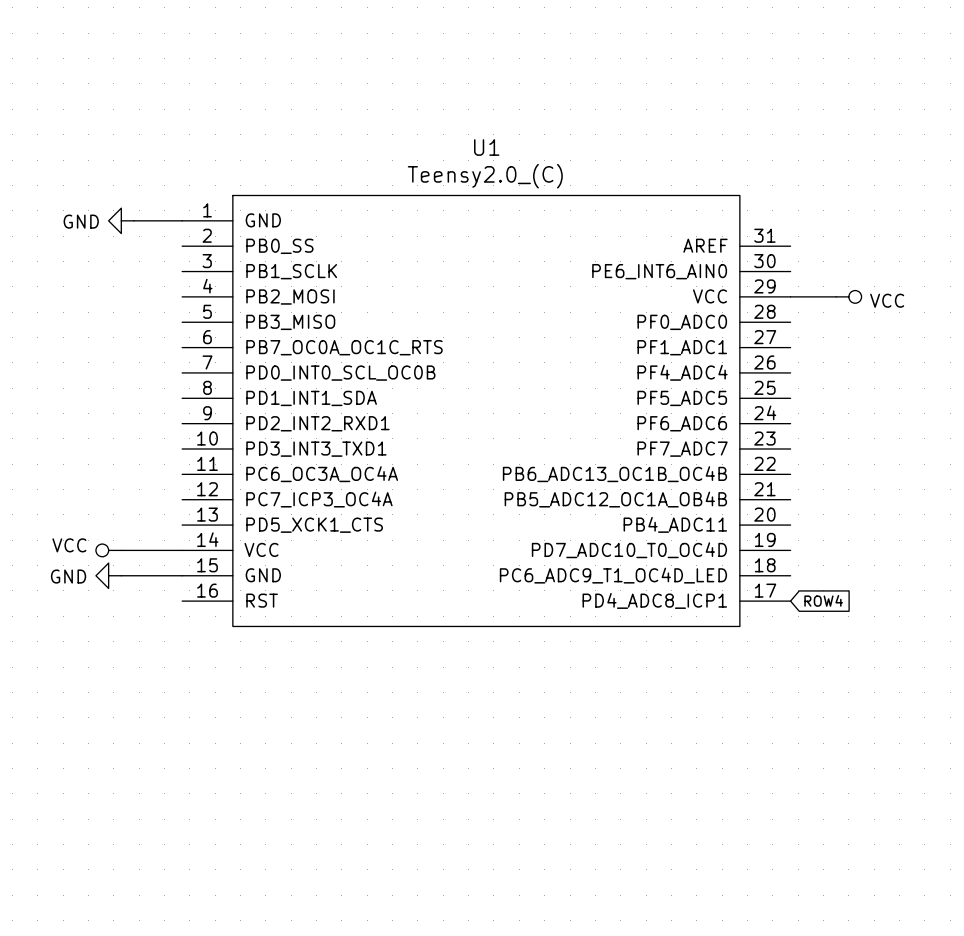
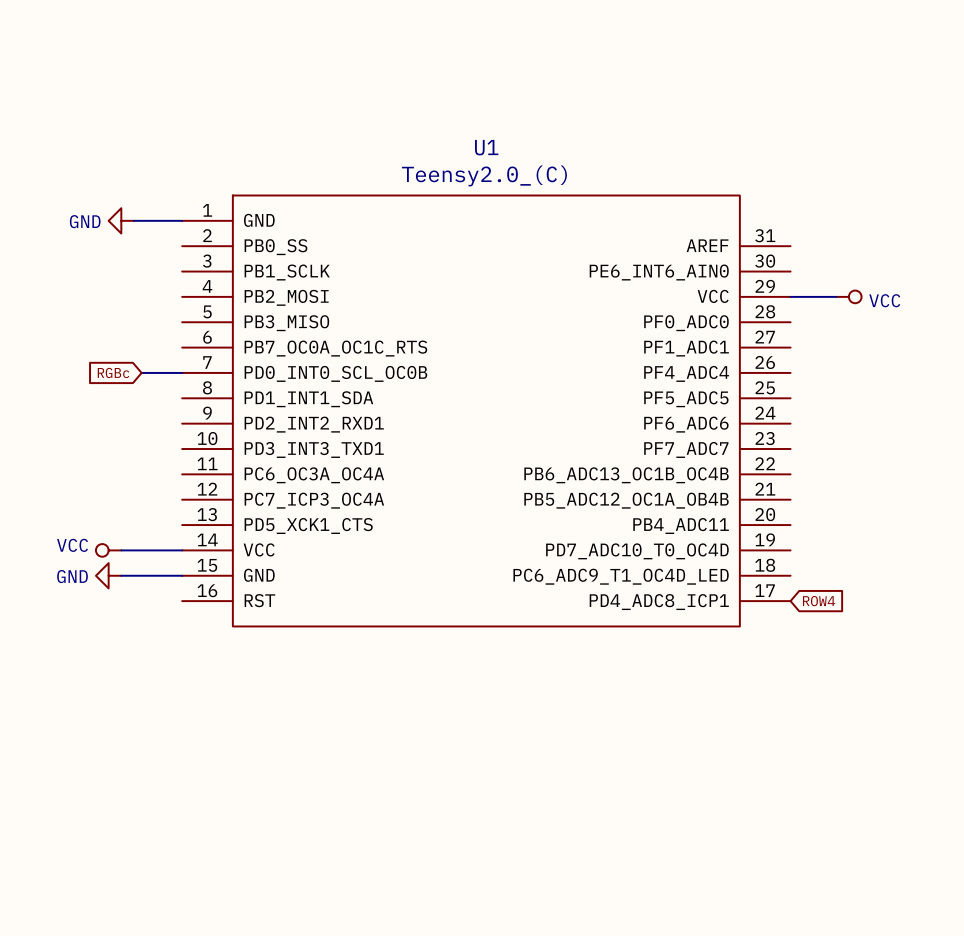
global label: none -> RGBc (113, 372)
wire: none -> (141, 372) (182, 372)

